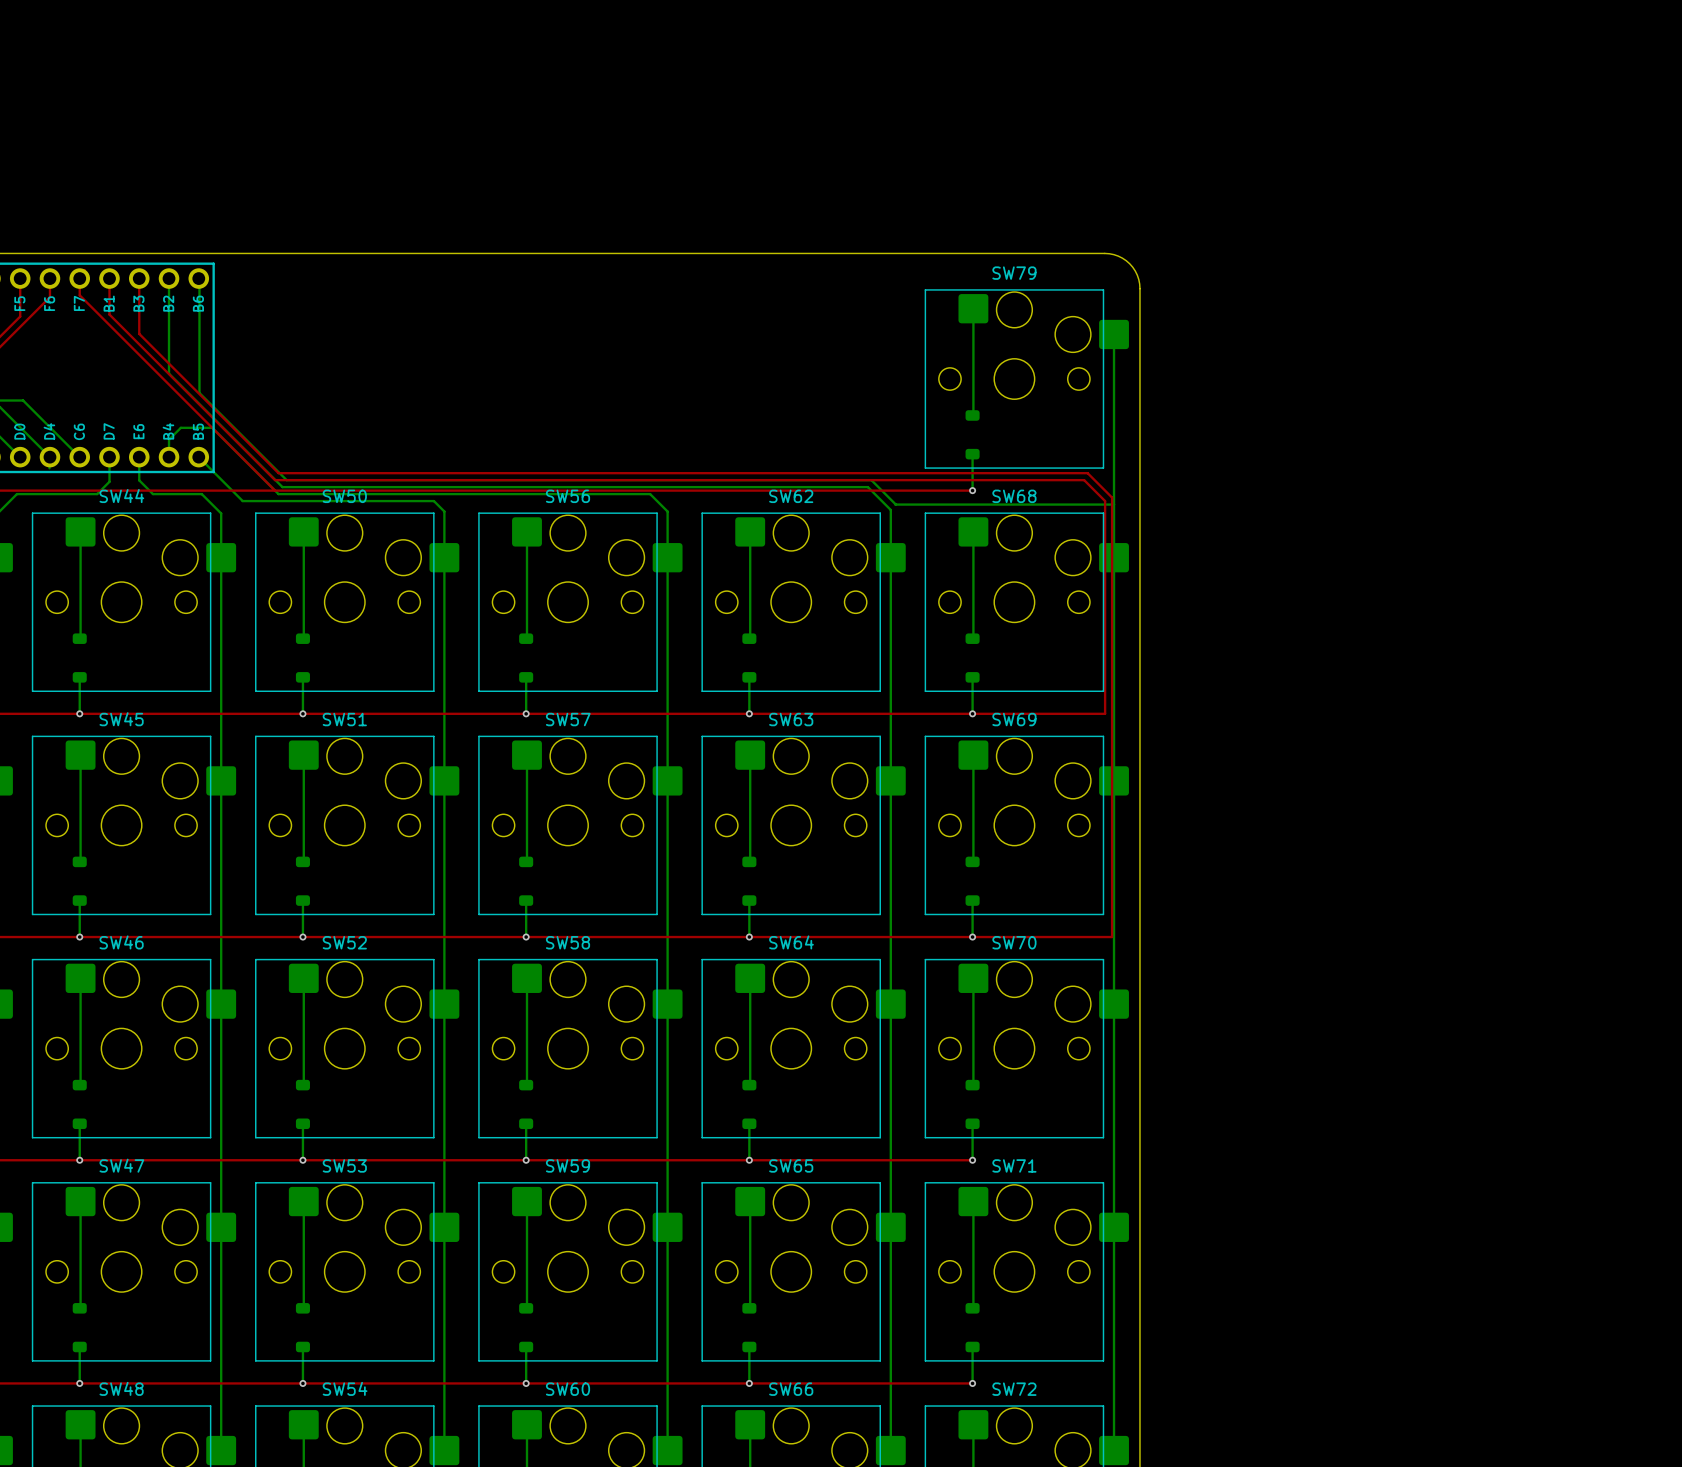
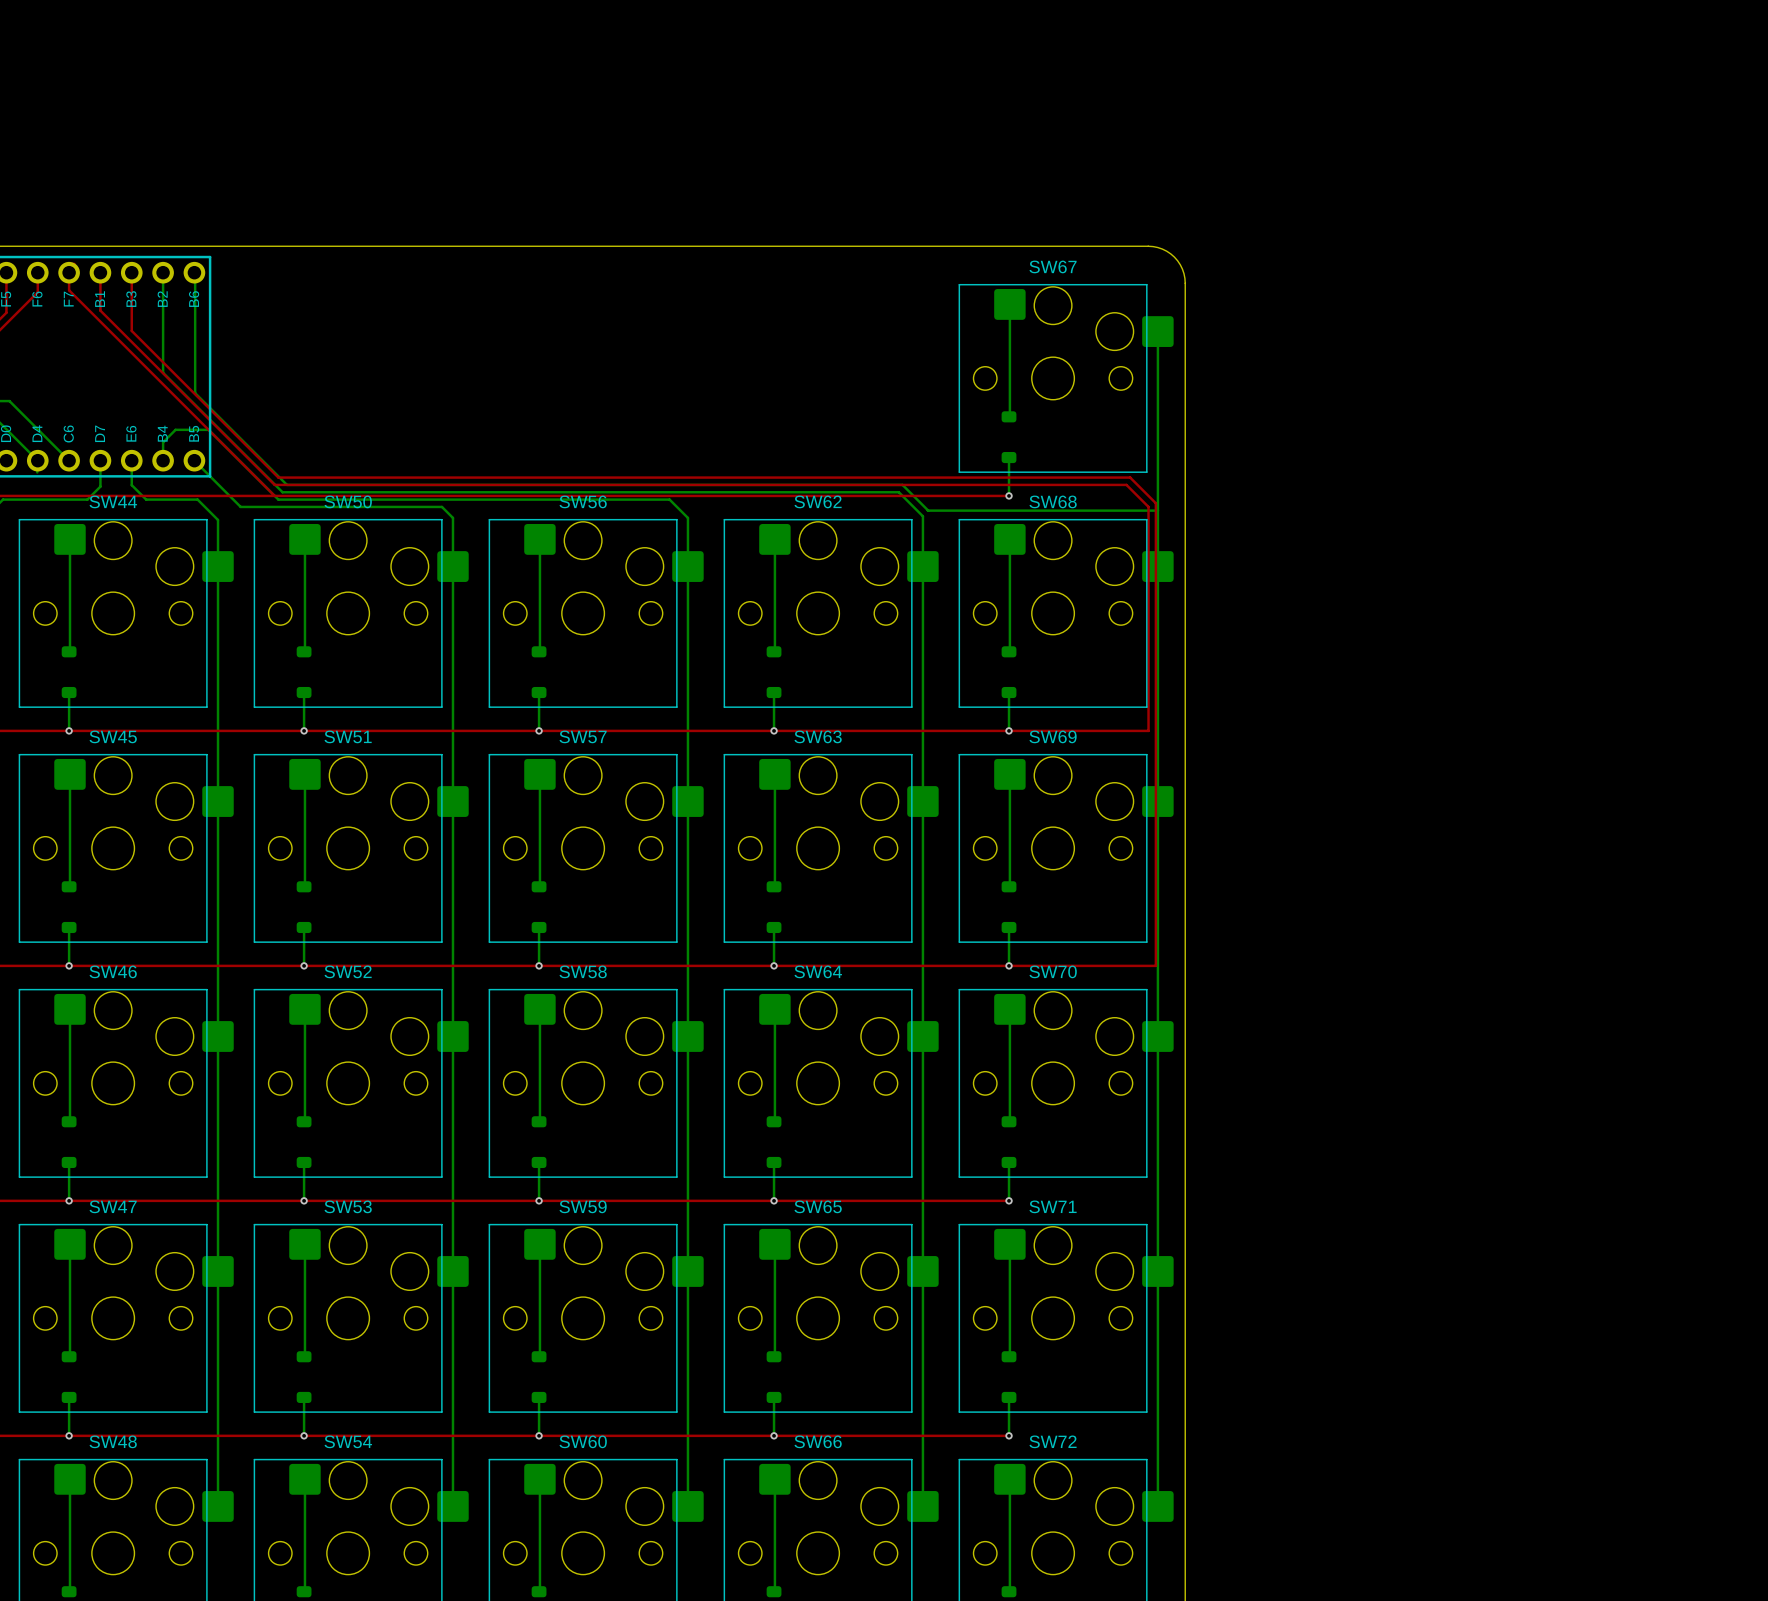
SW79 name: SW79 (1014, 273) -> SW67 (1053, 266)

